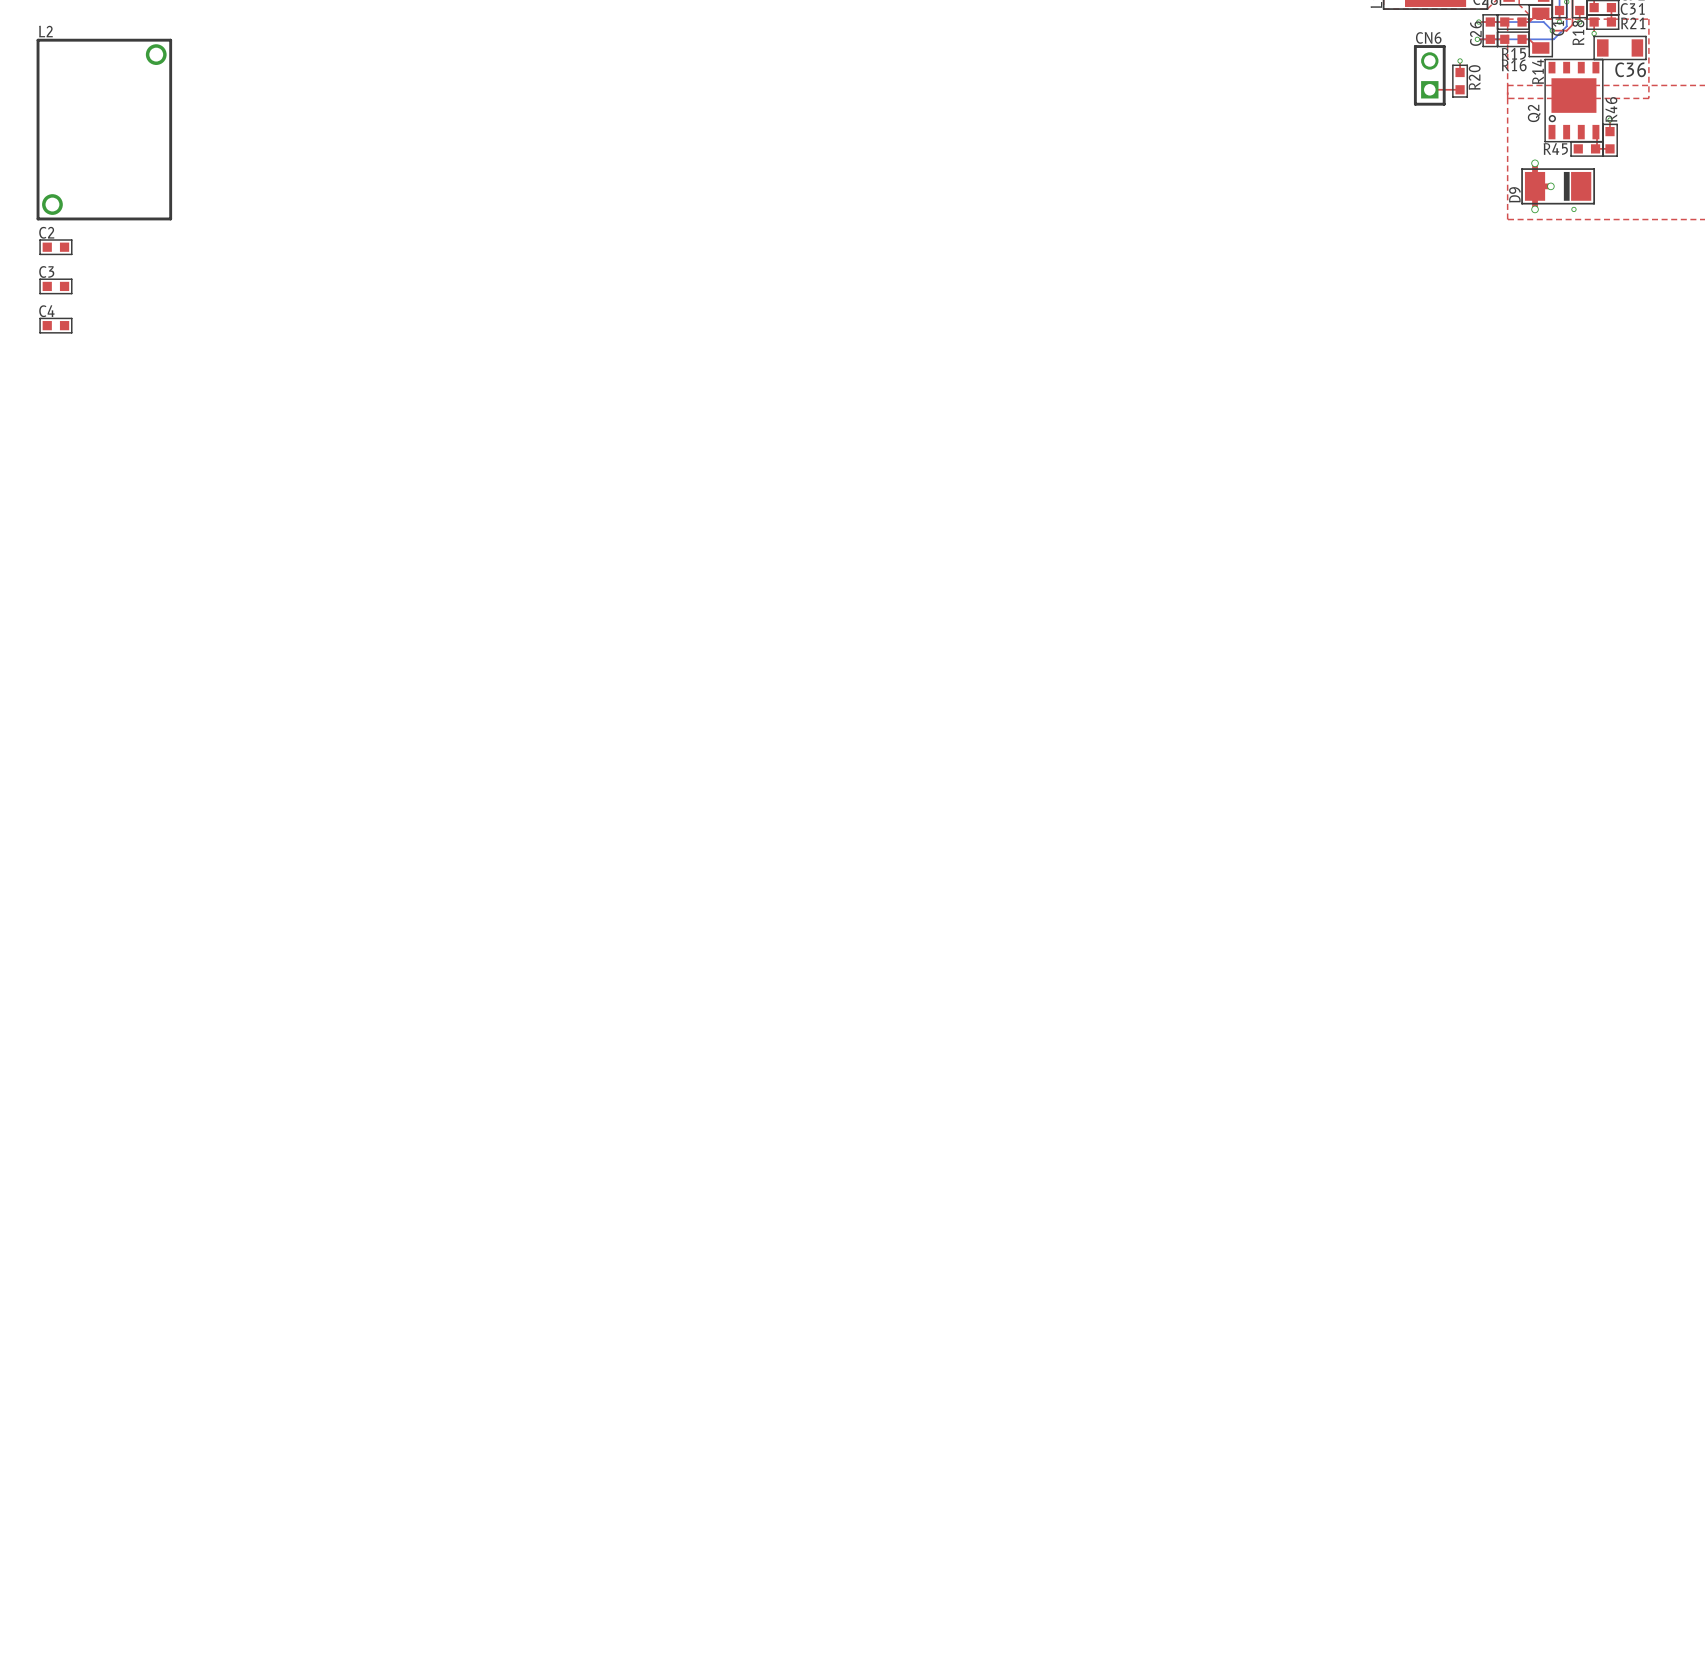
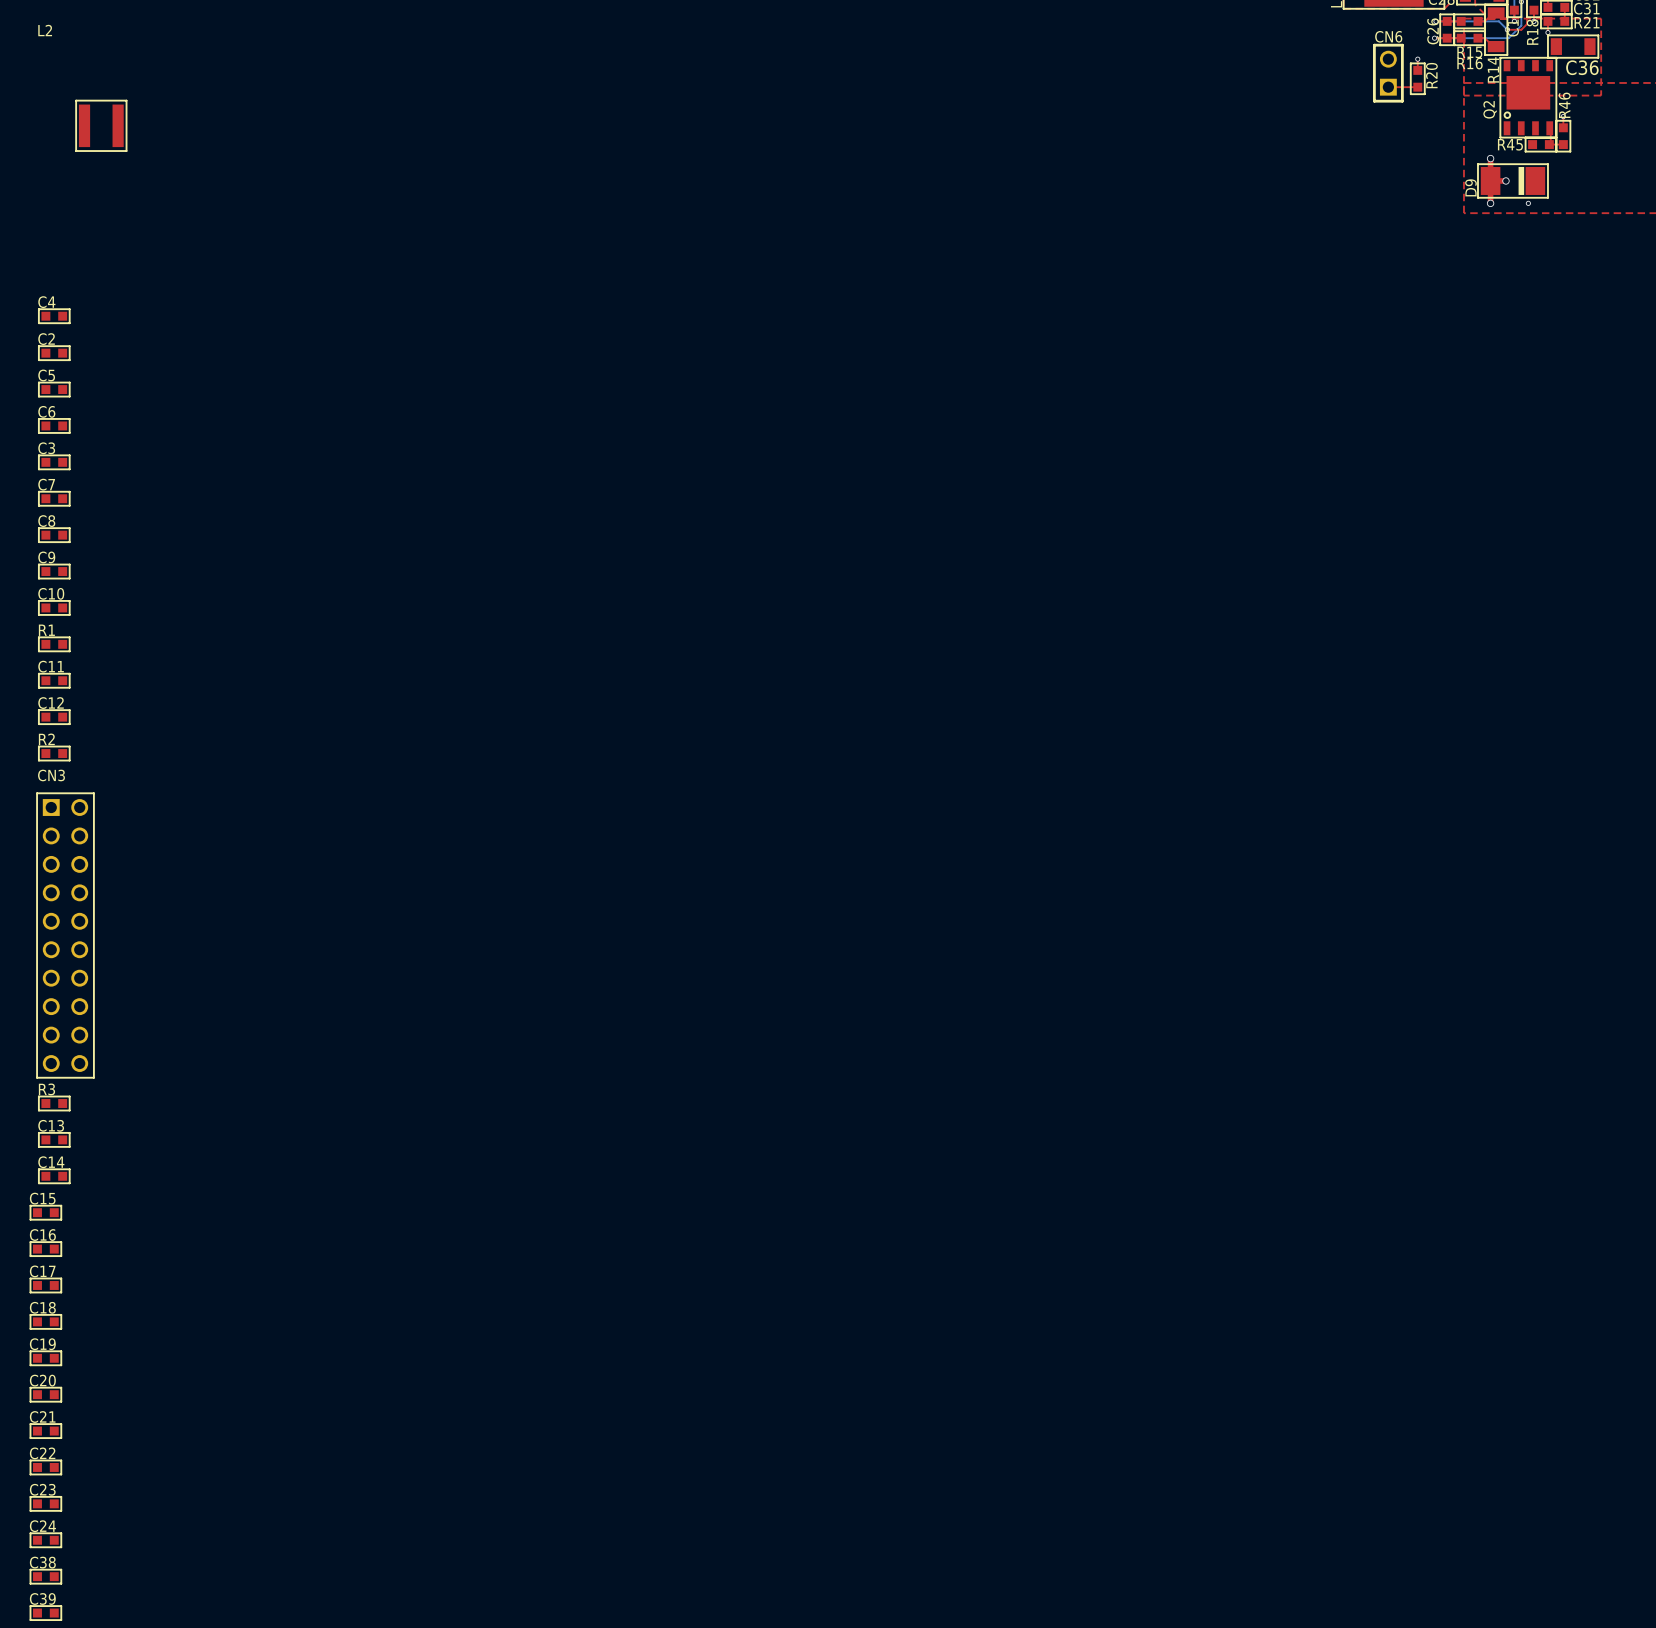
L2 footprint: [36, 38, 173, 221] -> [75, 99, 128, 152]
C2 position: (55, 247) -> (54, 353)
C3 position: (55, 286) -> (54, 462)
C5: none -> (54, 389)
C6: none -> (54, 425)
C7: none -> (54, 498)
C8: none -> (54, 535)
C9: none -> (54, 571)
C10: none -> (54, 607)
R1: none -> (54, 644)
C11: none -> (54, 680)
C12: none -> (54, 717)
R2: none -> (54, 753)
CN3: none -> (65, 935)
R3: none -> (54, 1103)
C13: none -> (54, 1139)
C14: none -> (54, 1176)
C15: none -> (45, 1212)
C16: none -> (45, 1249)
C17: none -> (45, 1285)
C18: none -> (45, 1321)
C19: none -> (45, 1358)
C20: none -> (45, 1394)
C21: none -> (45, 1431)
C22: none -> (45, 1467)
C23: none -> (45, 1503)
C24: none -> (45, 1540)
C38: none -> (45, 1576)
C39: none -> (45, 1613)

